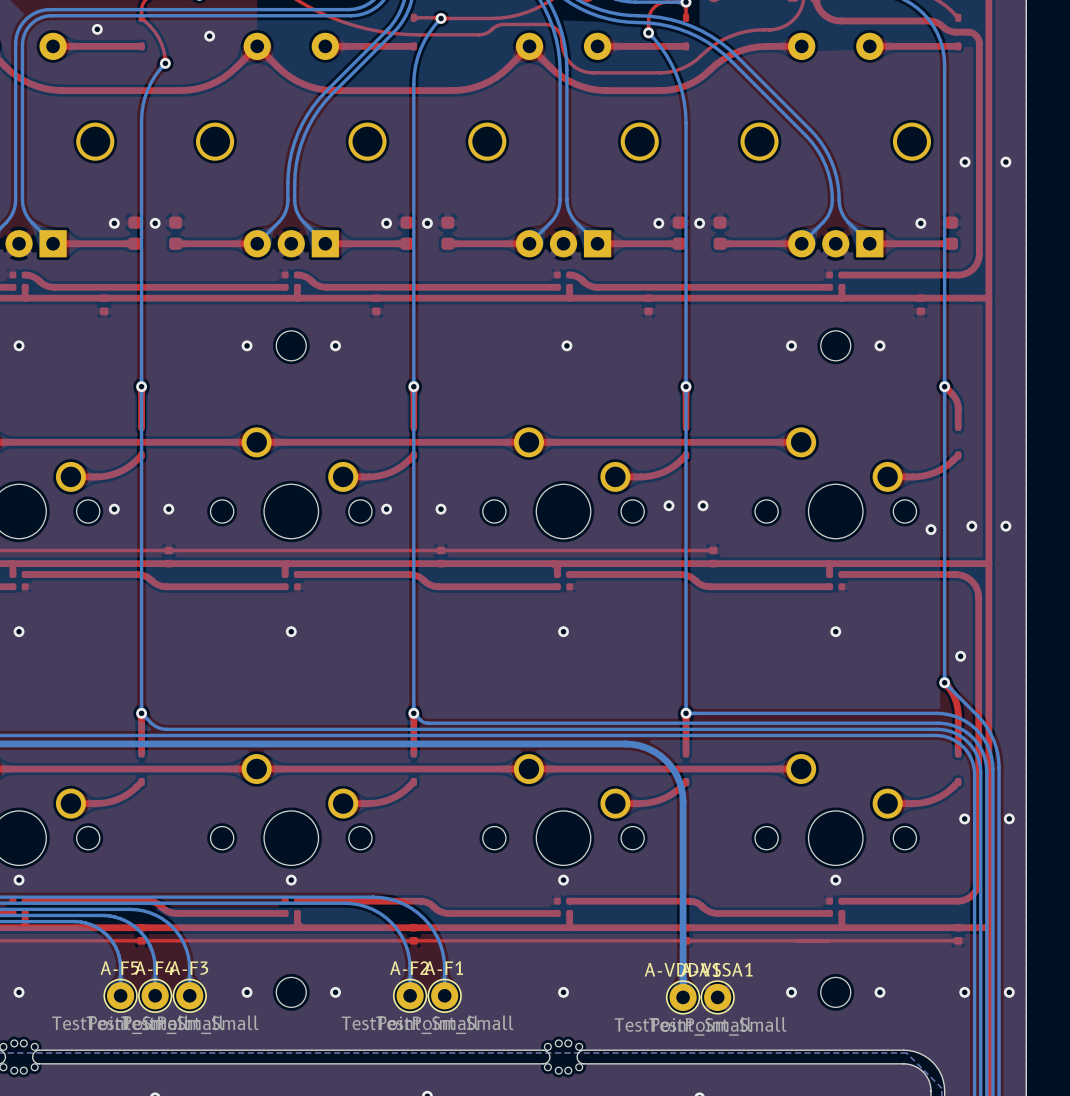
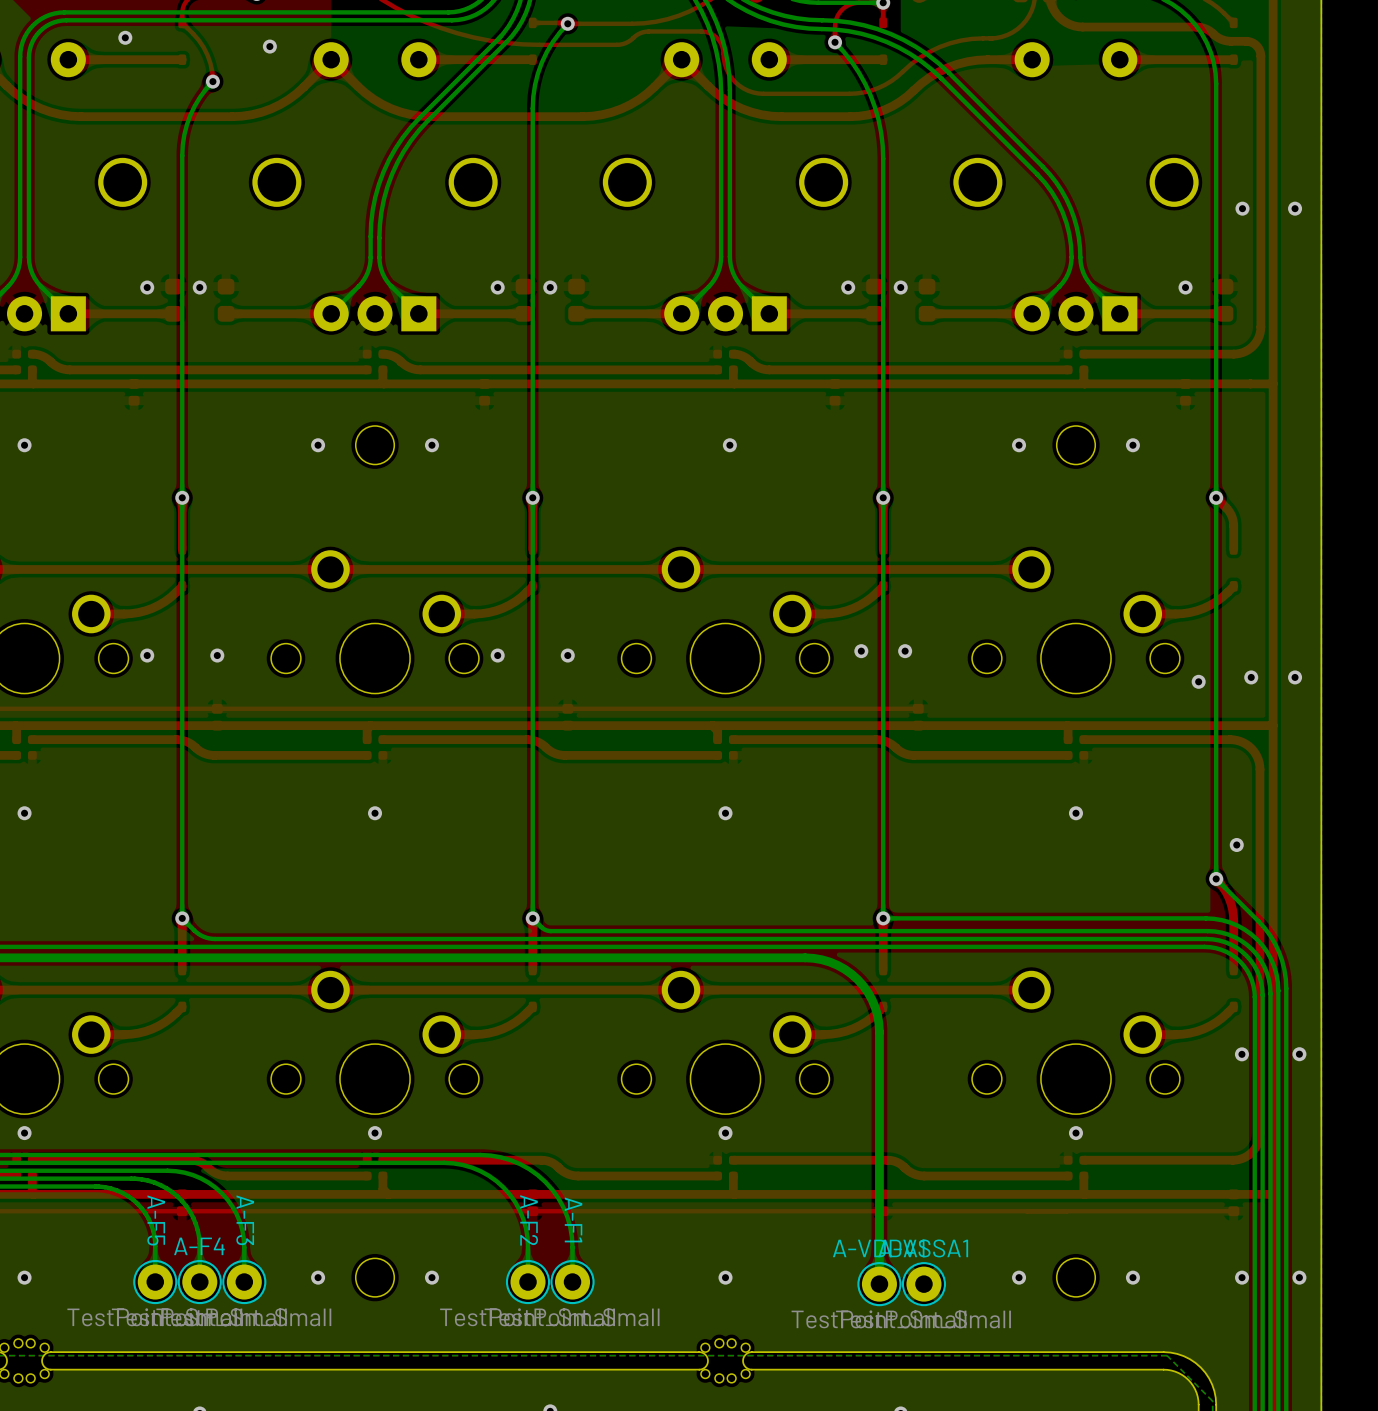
A-F5 name rotation: 0° (119, 968) -> 90° clockwise (156, 1220)
A-F3 name rotation: 0° (188, 968) -> 90° clockwise (245, 1220)
A-F2 name rotation: 0° (409, 968) -> 90° clockwise (529, 1220)
A-F1 name rotation: 0° (443, 968) -> 90° clockwise (573, 1219)

